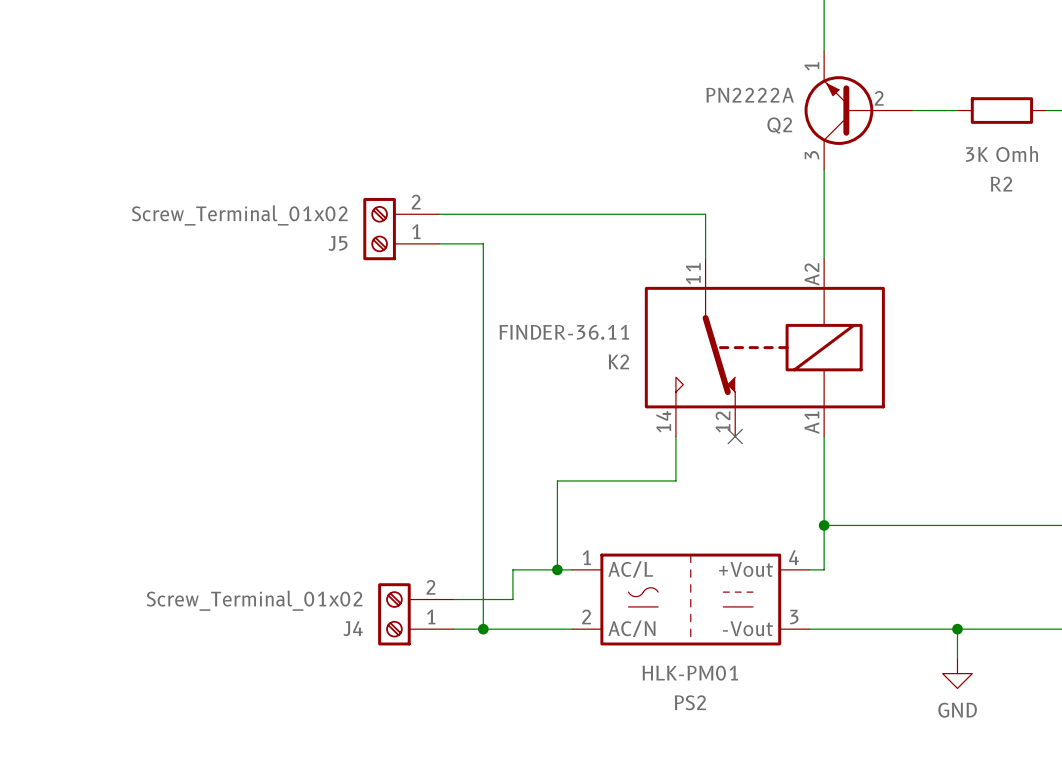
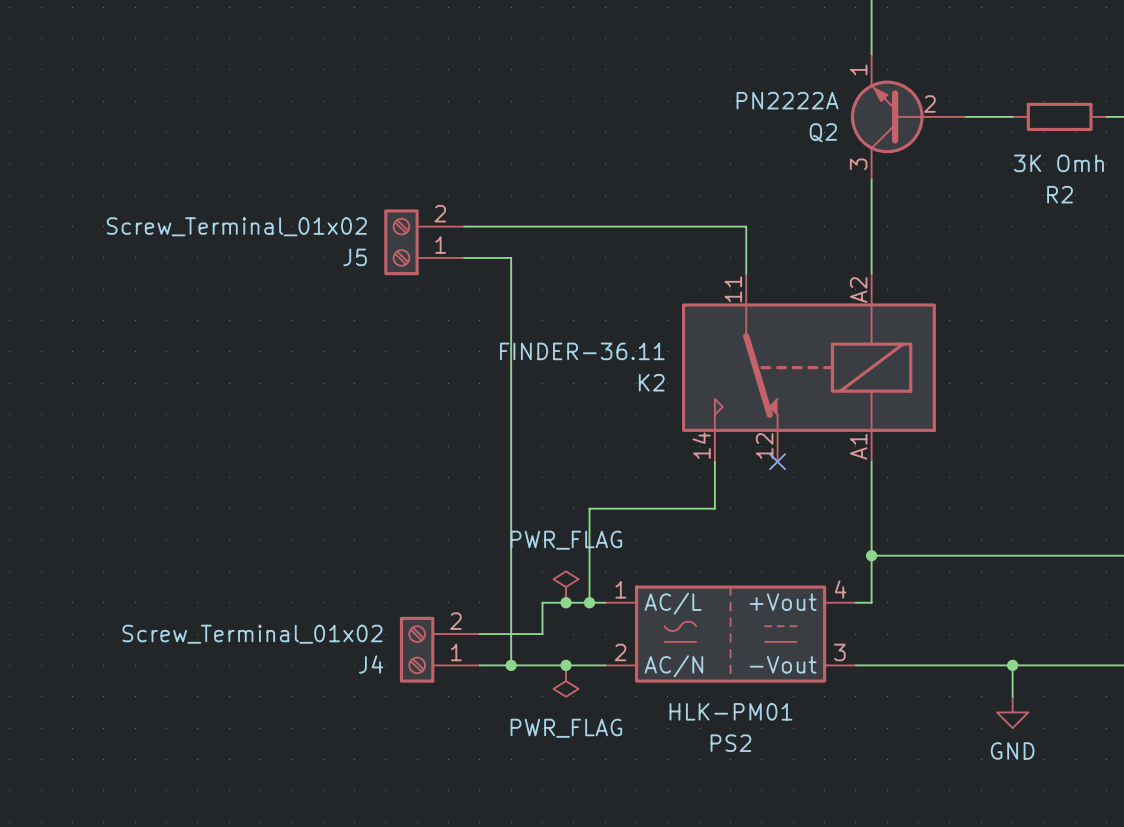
power symbol: none -> PWR_FLAG (566, 587)
junction: none -> (566, 602)
junction: none -> (566, 665)
power symbol: none -> PWR_FLAG (566, 681)

